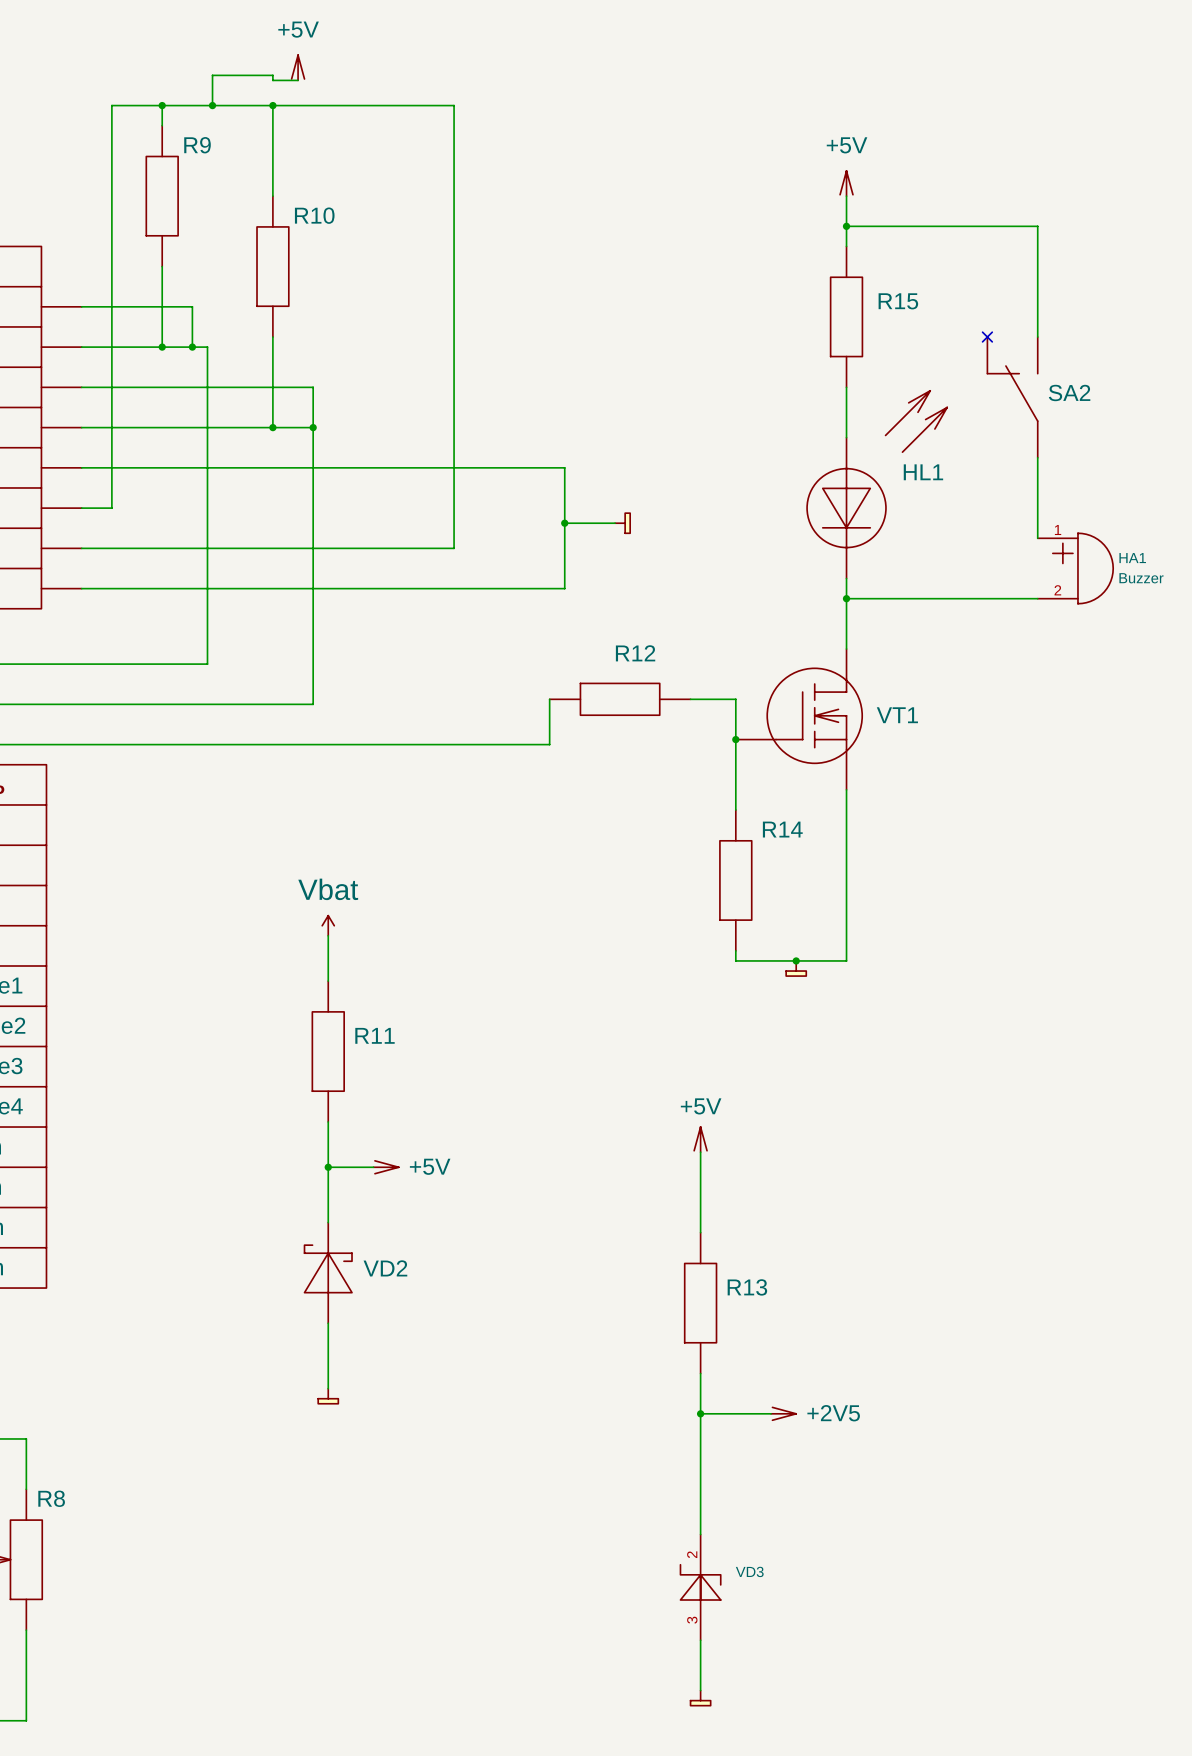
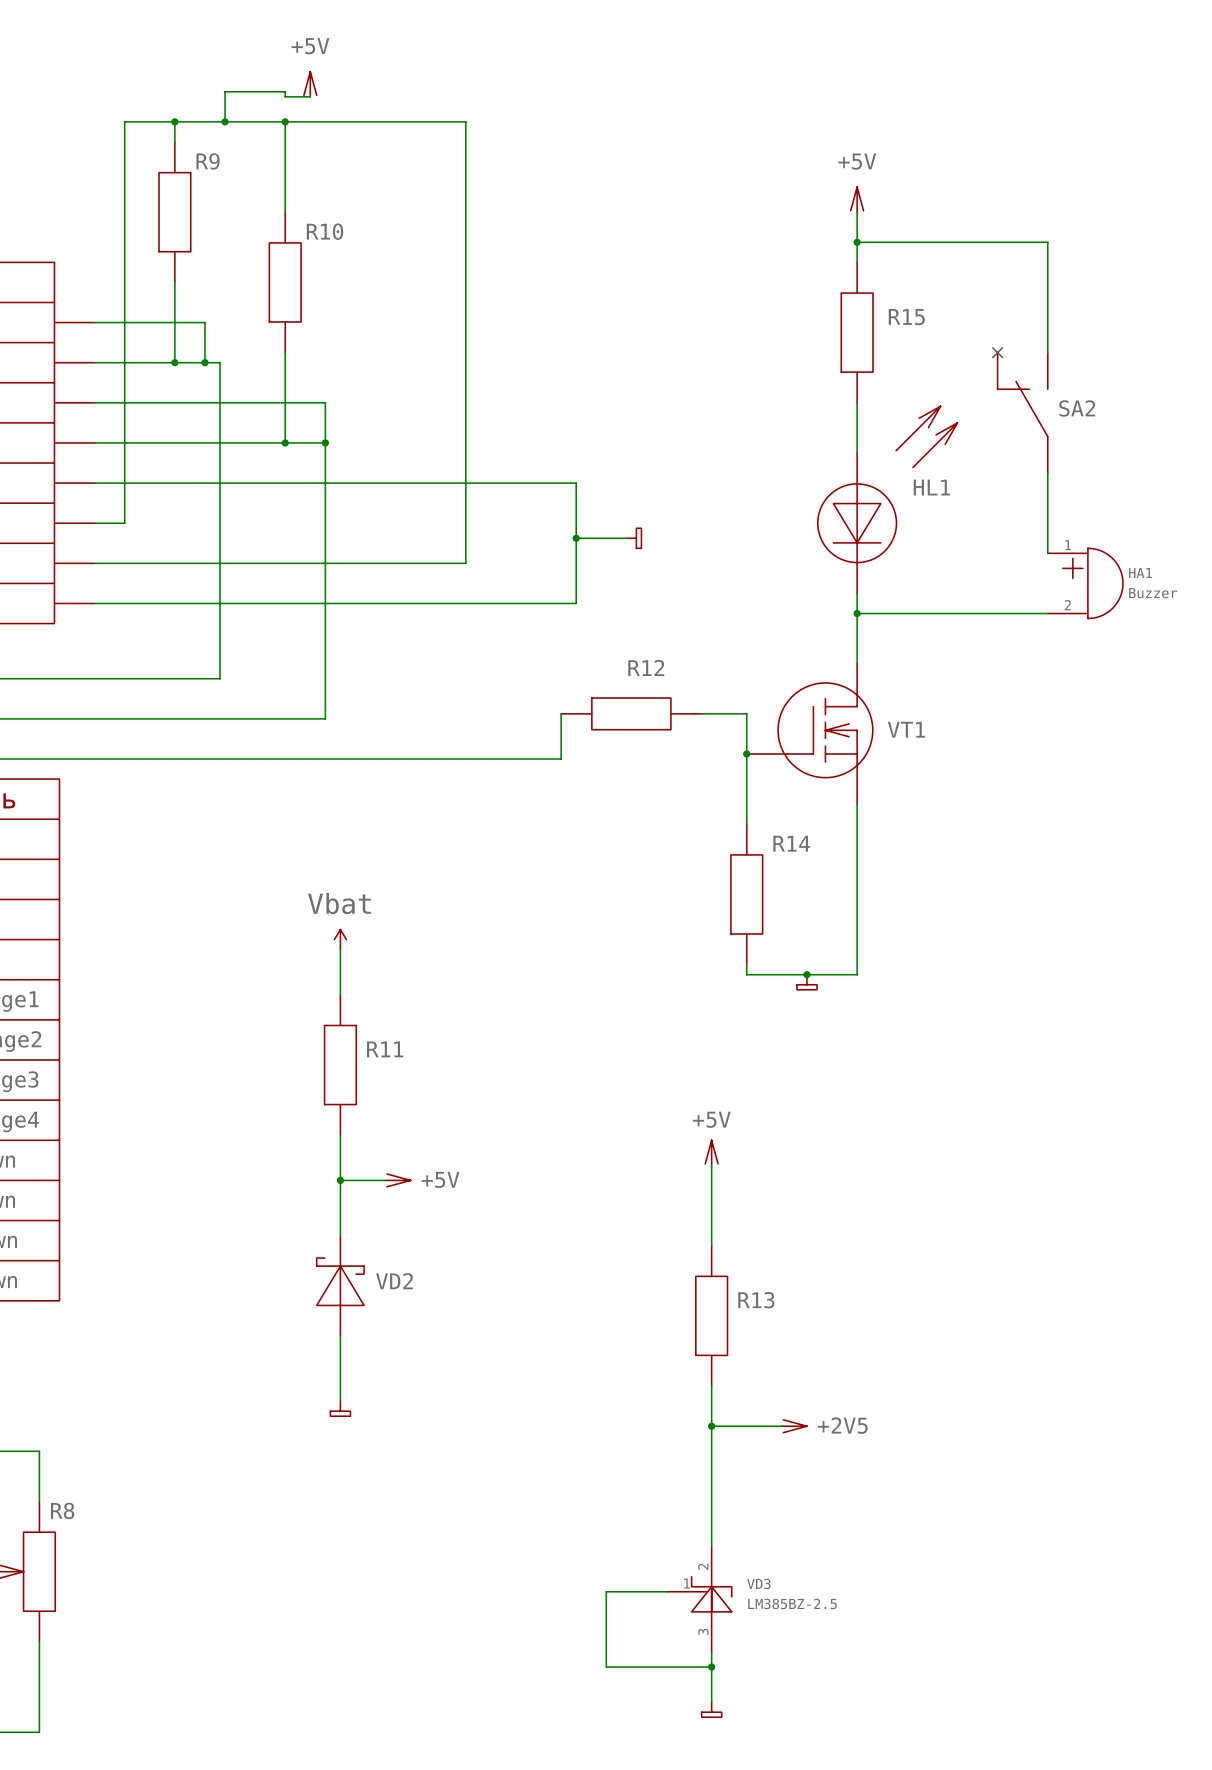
VD3 symbol: [679, 1534, 722, 1641] -> [666, 1546, 733, 1652]
wire: none -> (666, 1591) (606, 1591) (606, 1667) (711, 1667)
VD3 value: none -> LM385BZ-2.5 (792, 1603)
junction: none -> (711, 1667)

